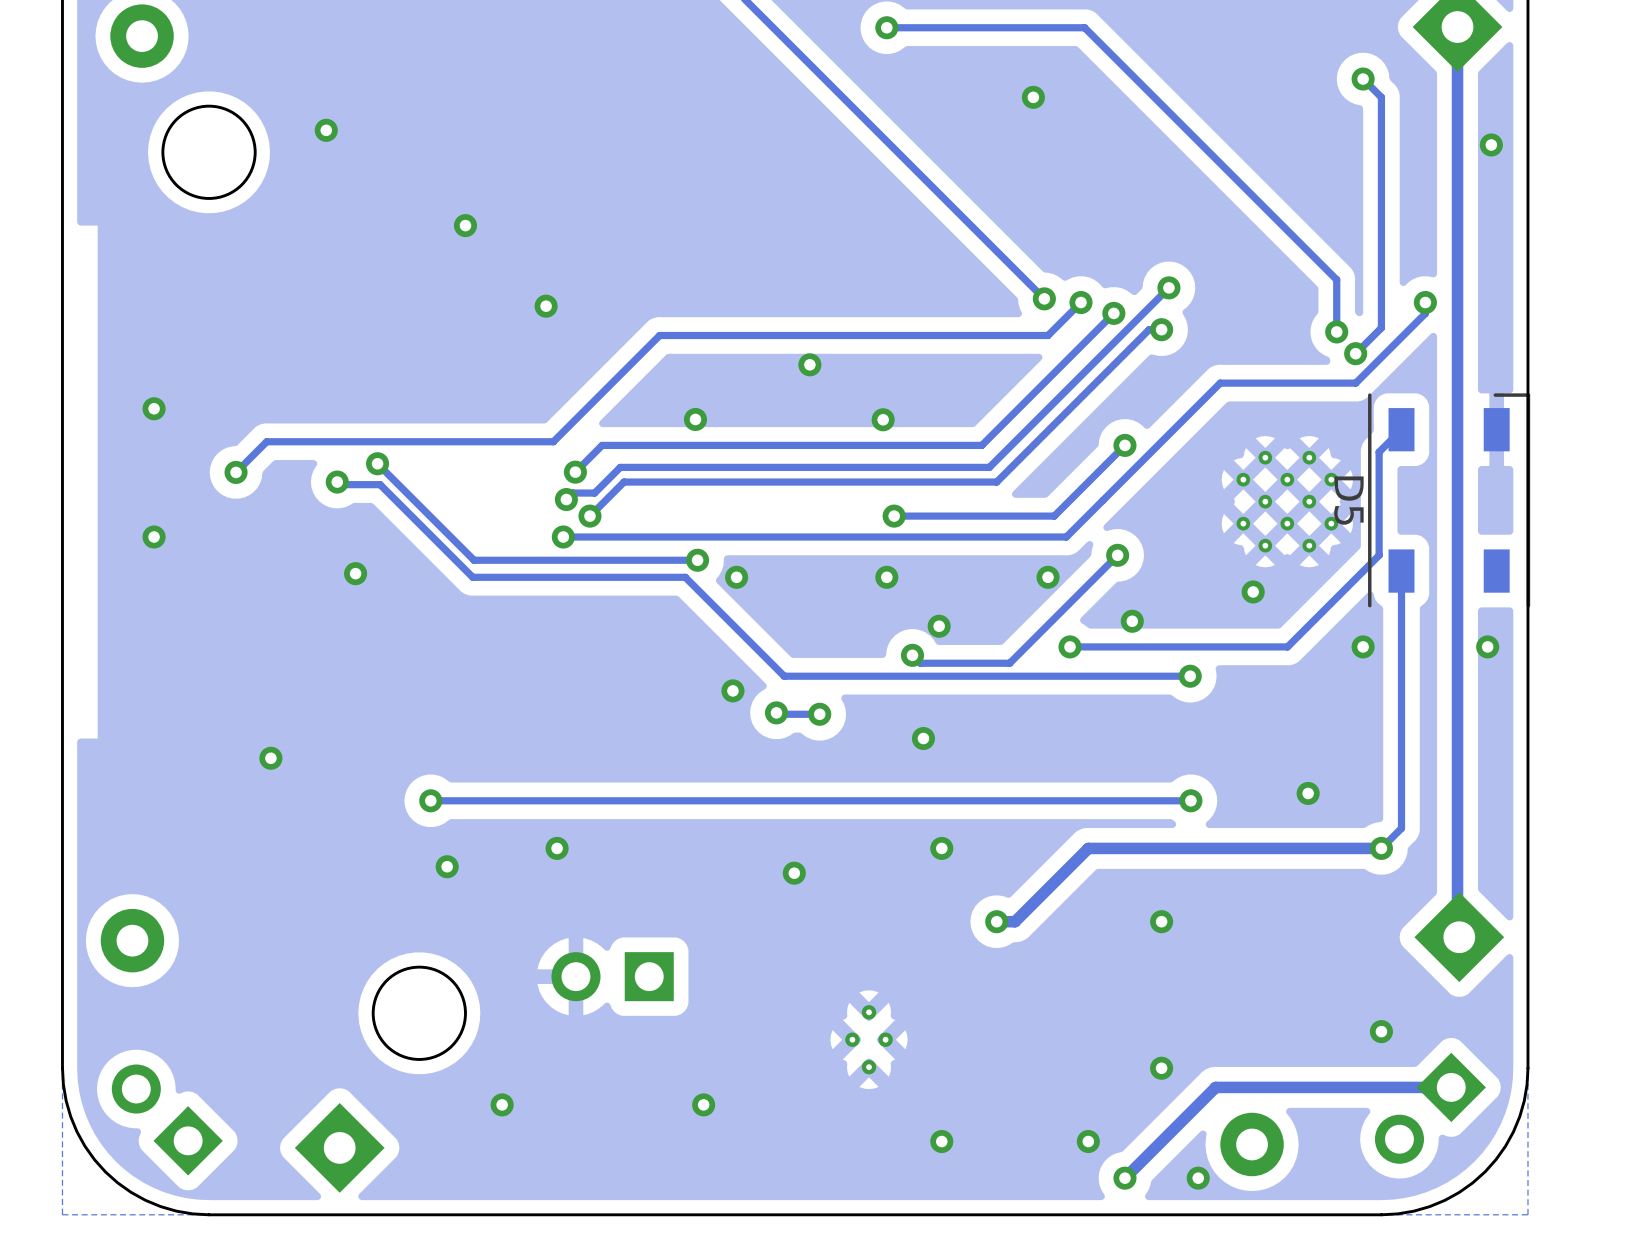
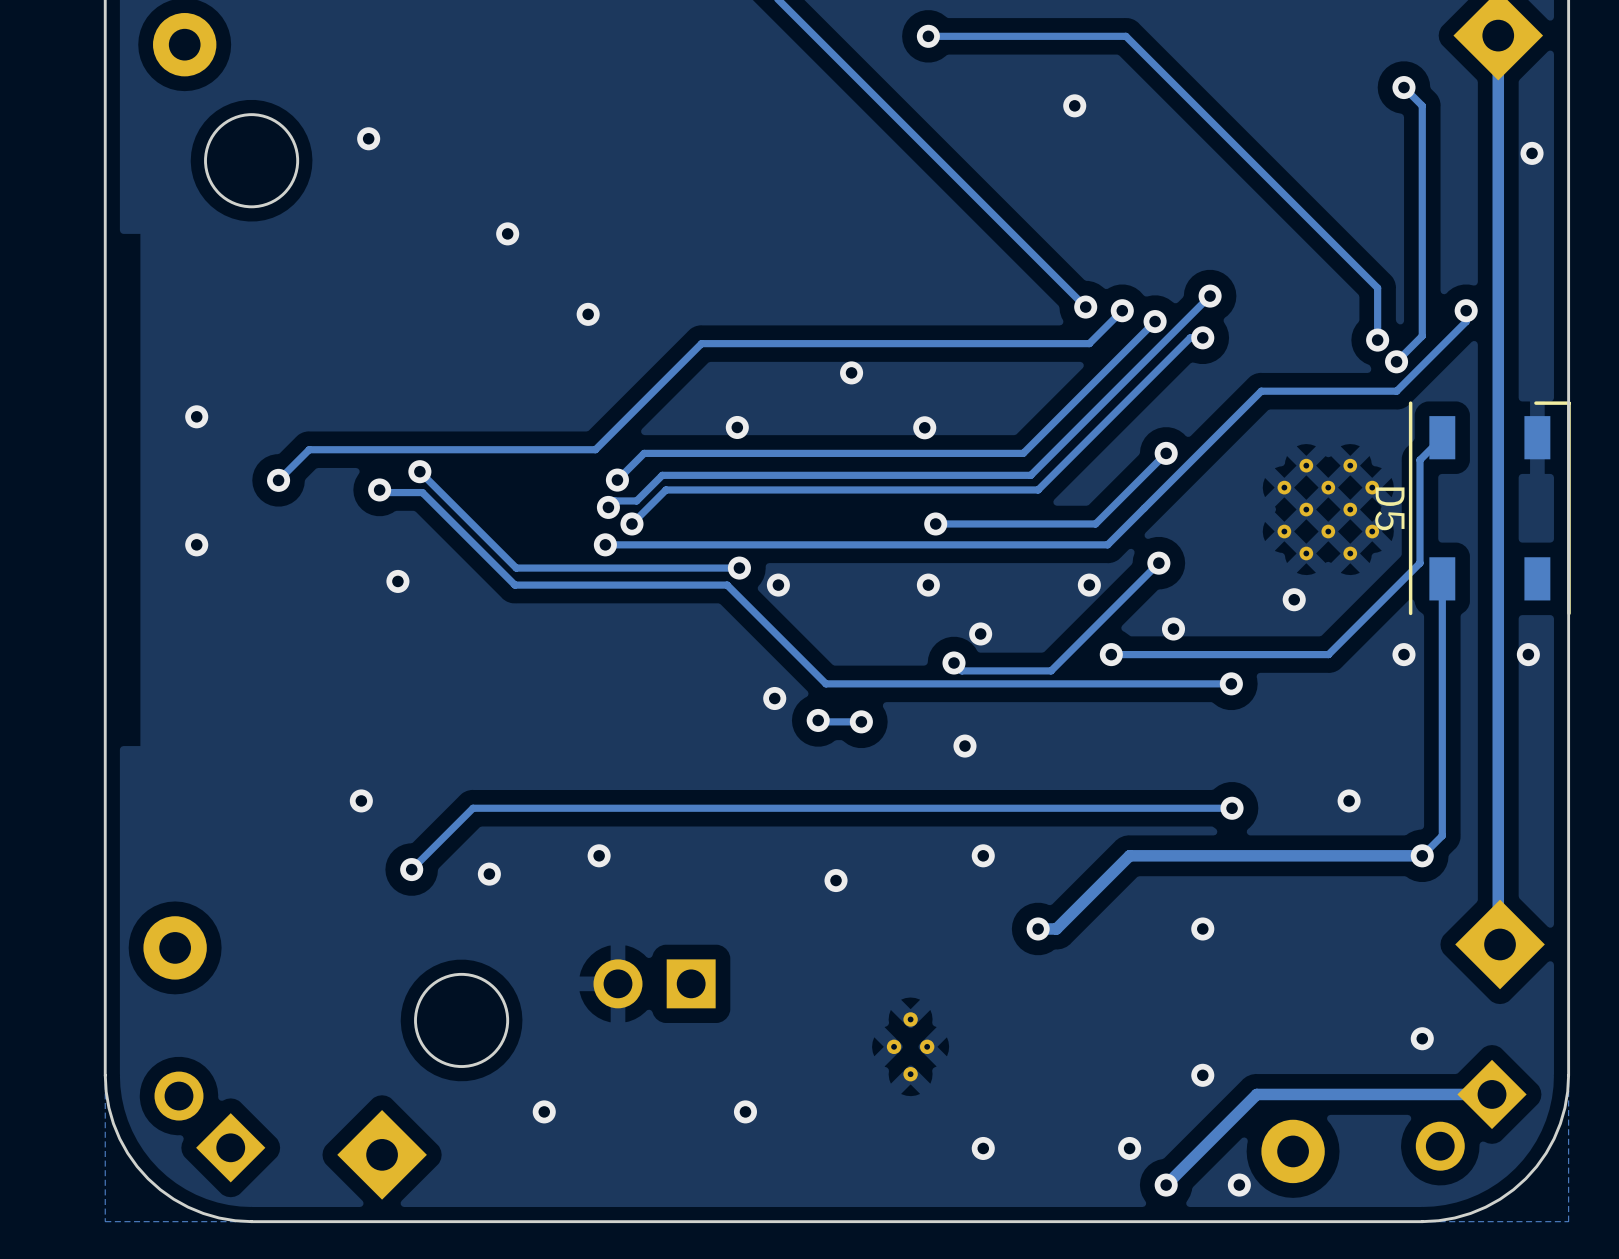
via: (270, 758) -> none
via: none -> (361, 800)
track: none -> (473, 808) (411, 869)
via: (430, 800) -> none
via: none -> (411, 869)

